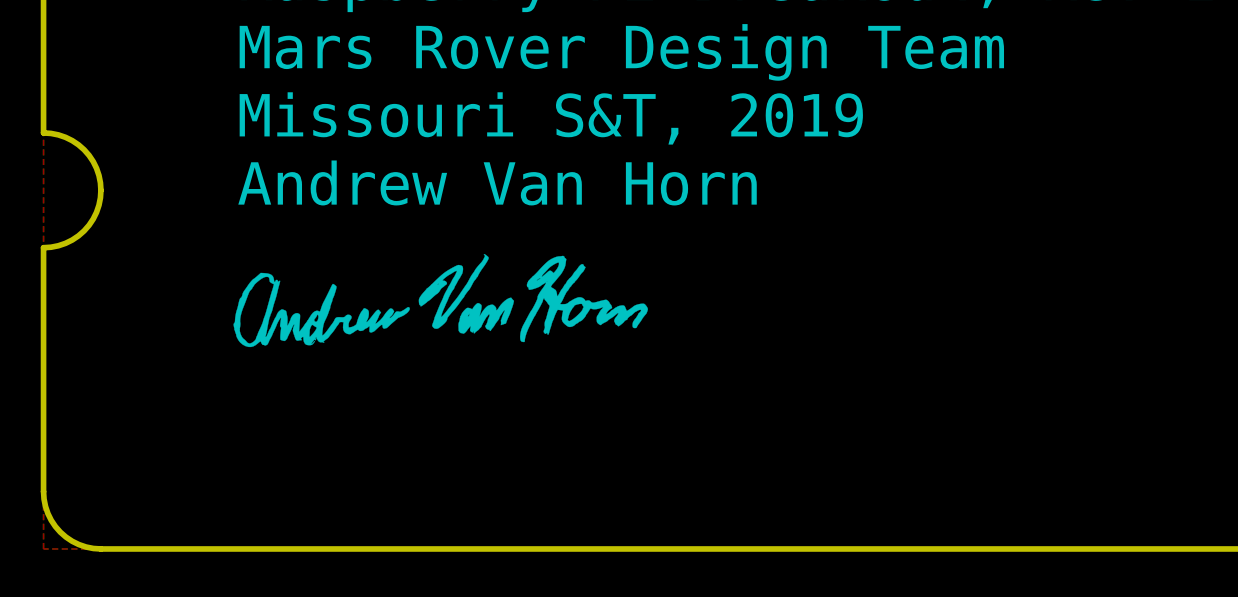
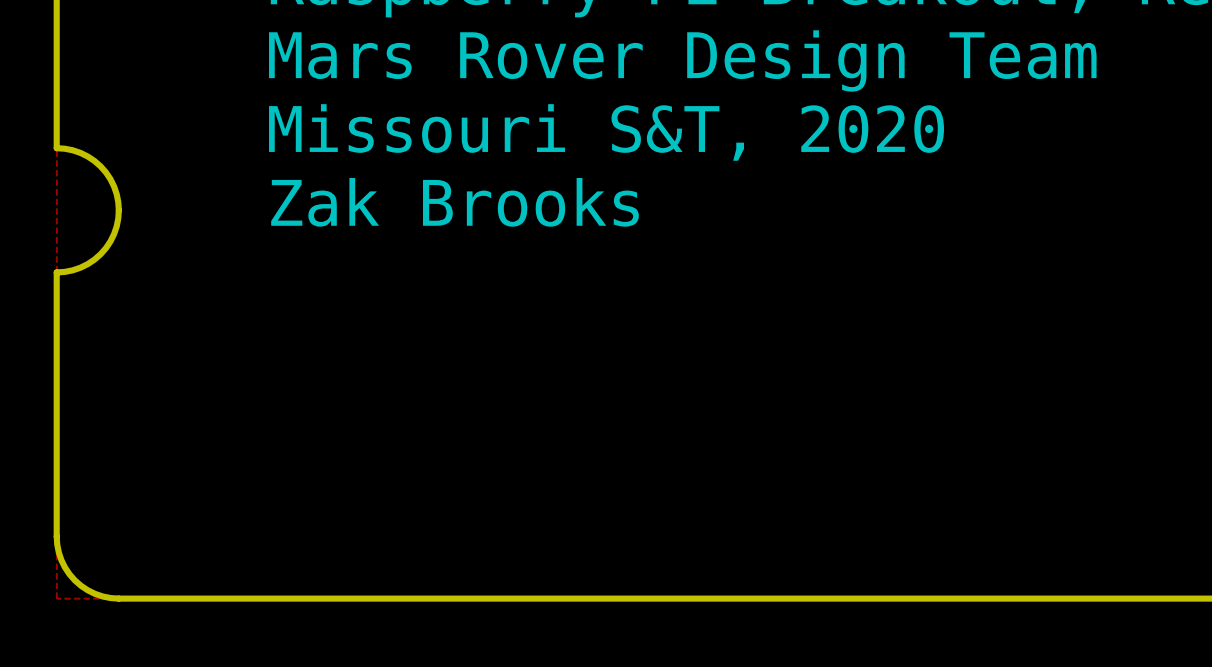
text: Missouri S&T, 2019 (551, 118) -> Missouri S&T, 2020 (606, 132)
text: Andrew Van Horn (497, 182) -> Zak Brooks (455, 202)
drawing: [233, 254, 649, 348] -> none

